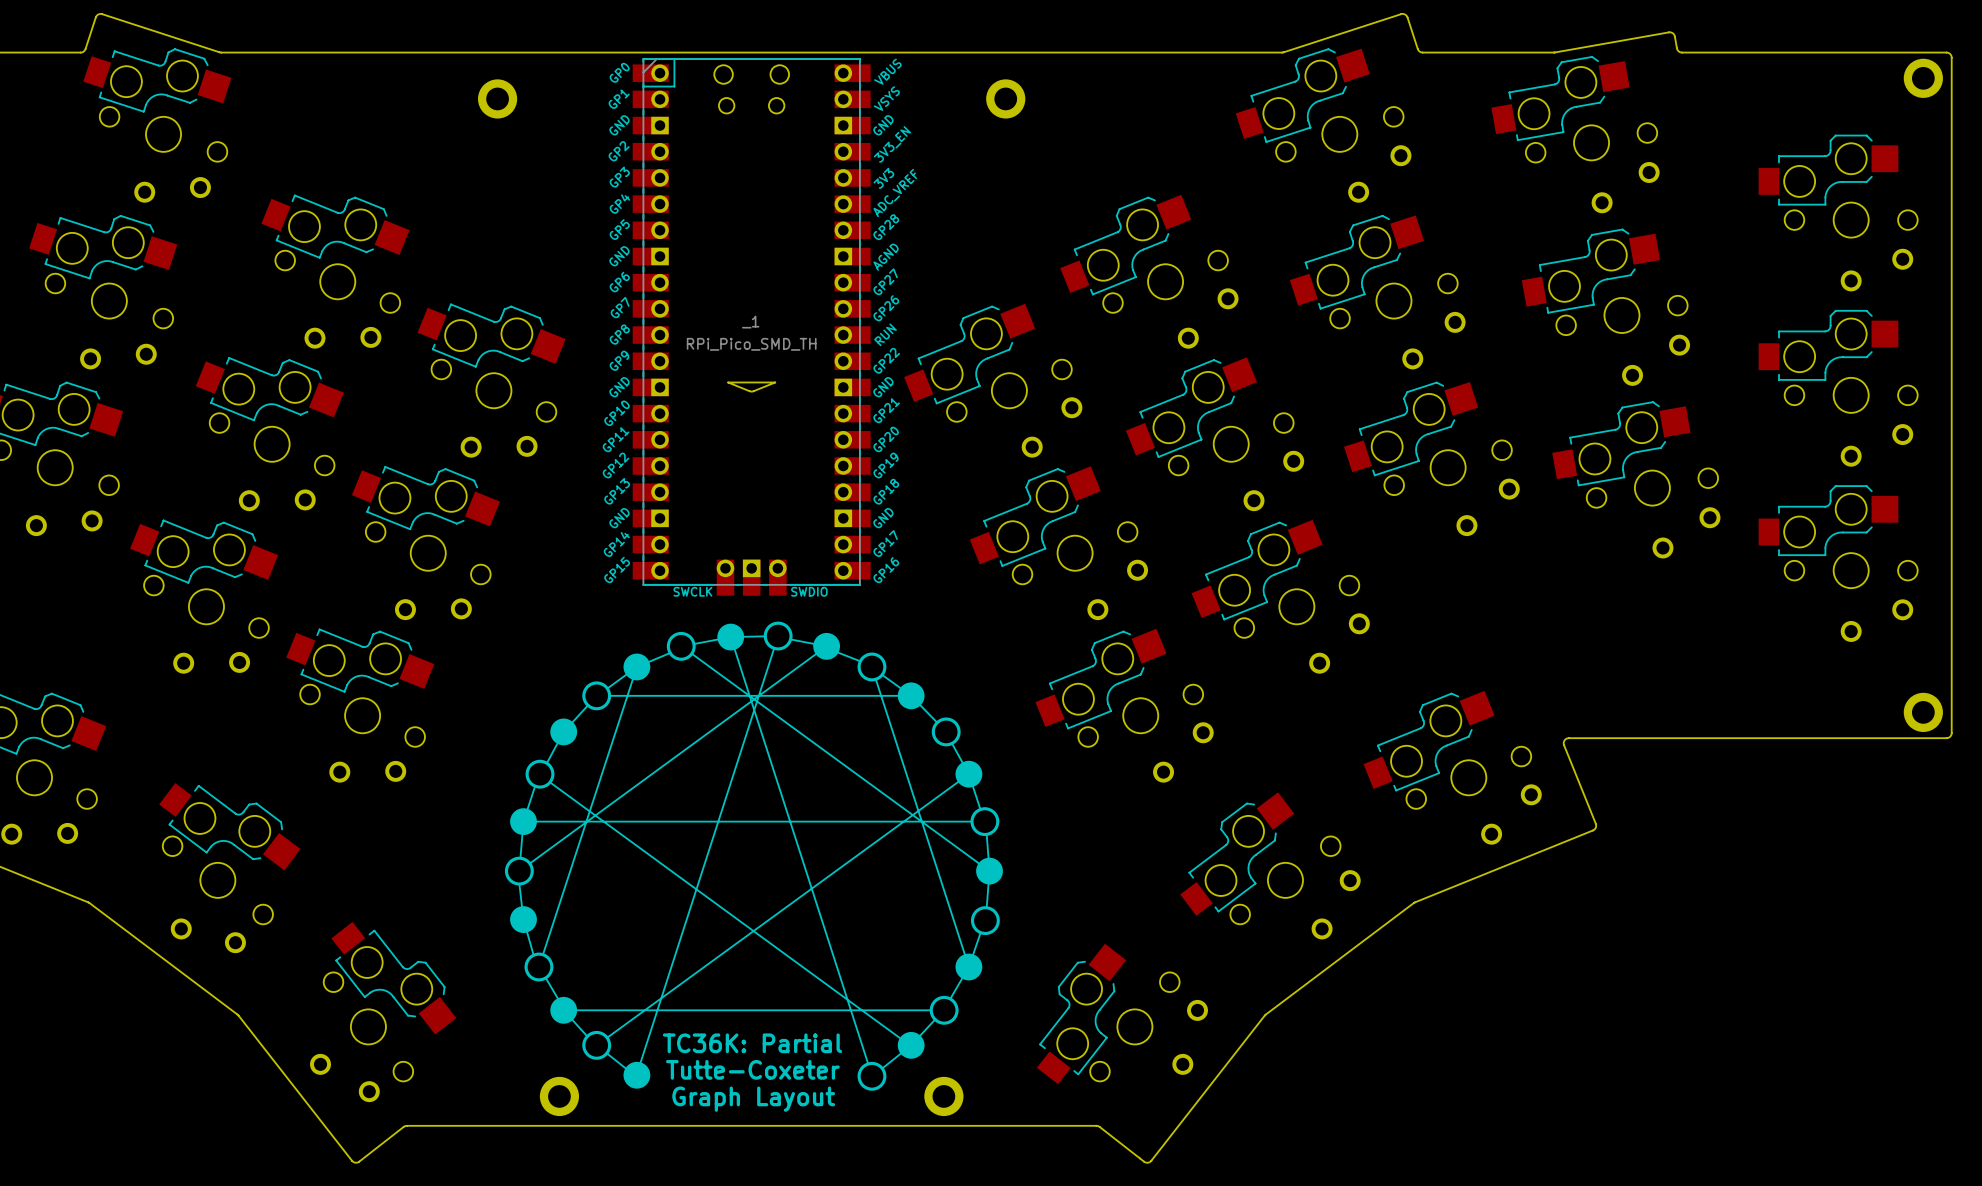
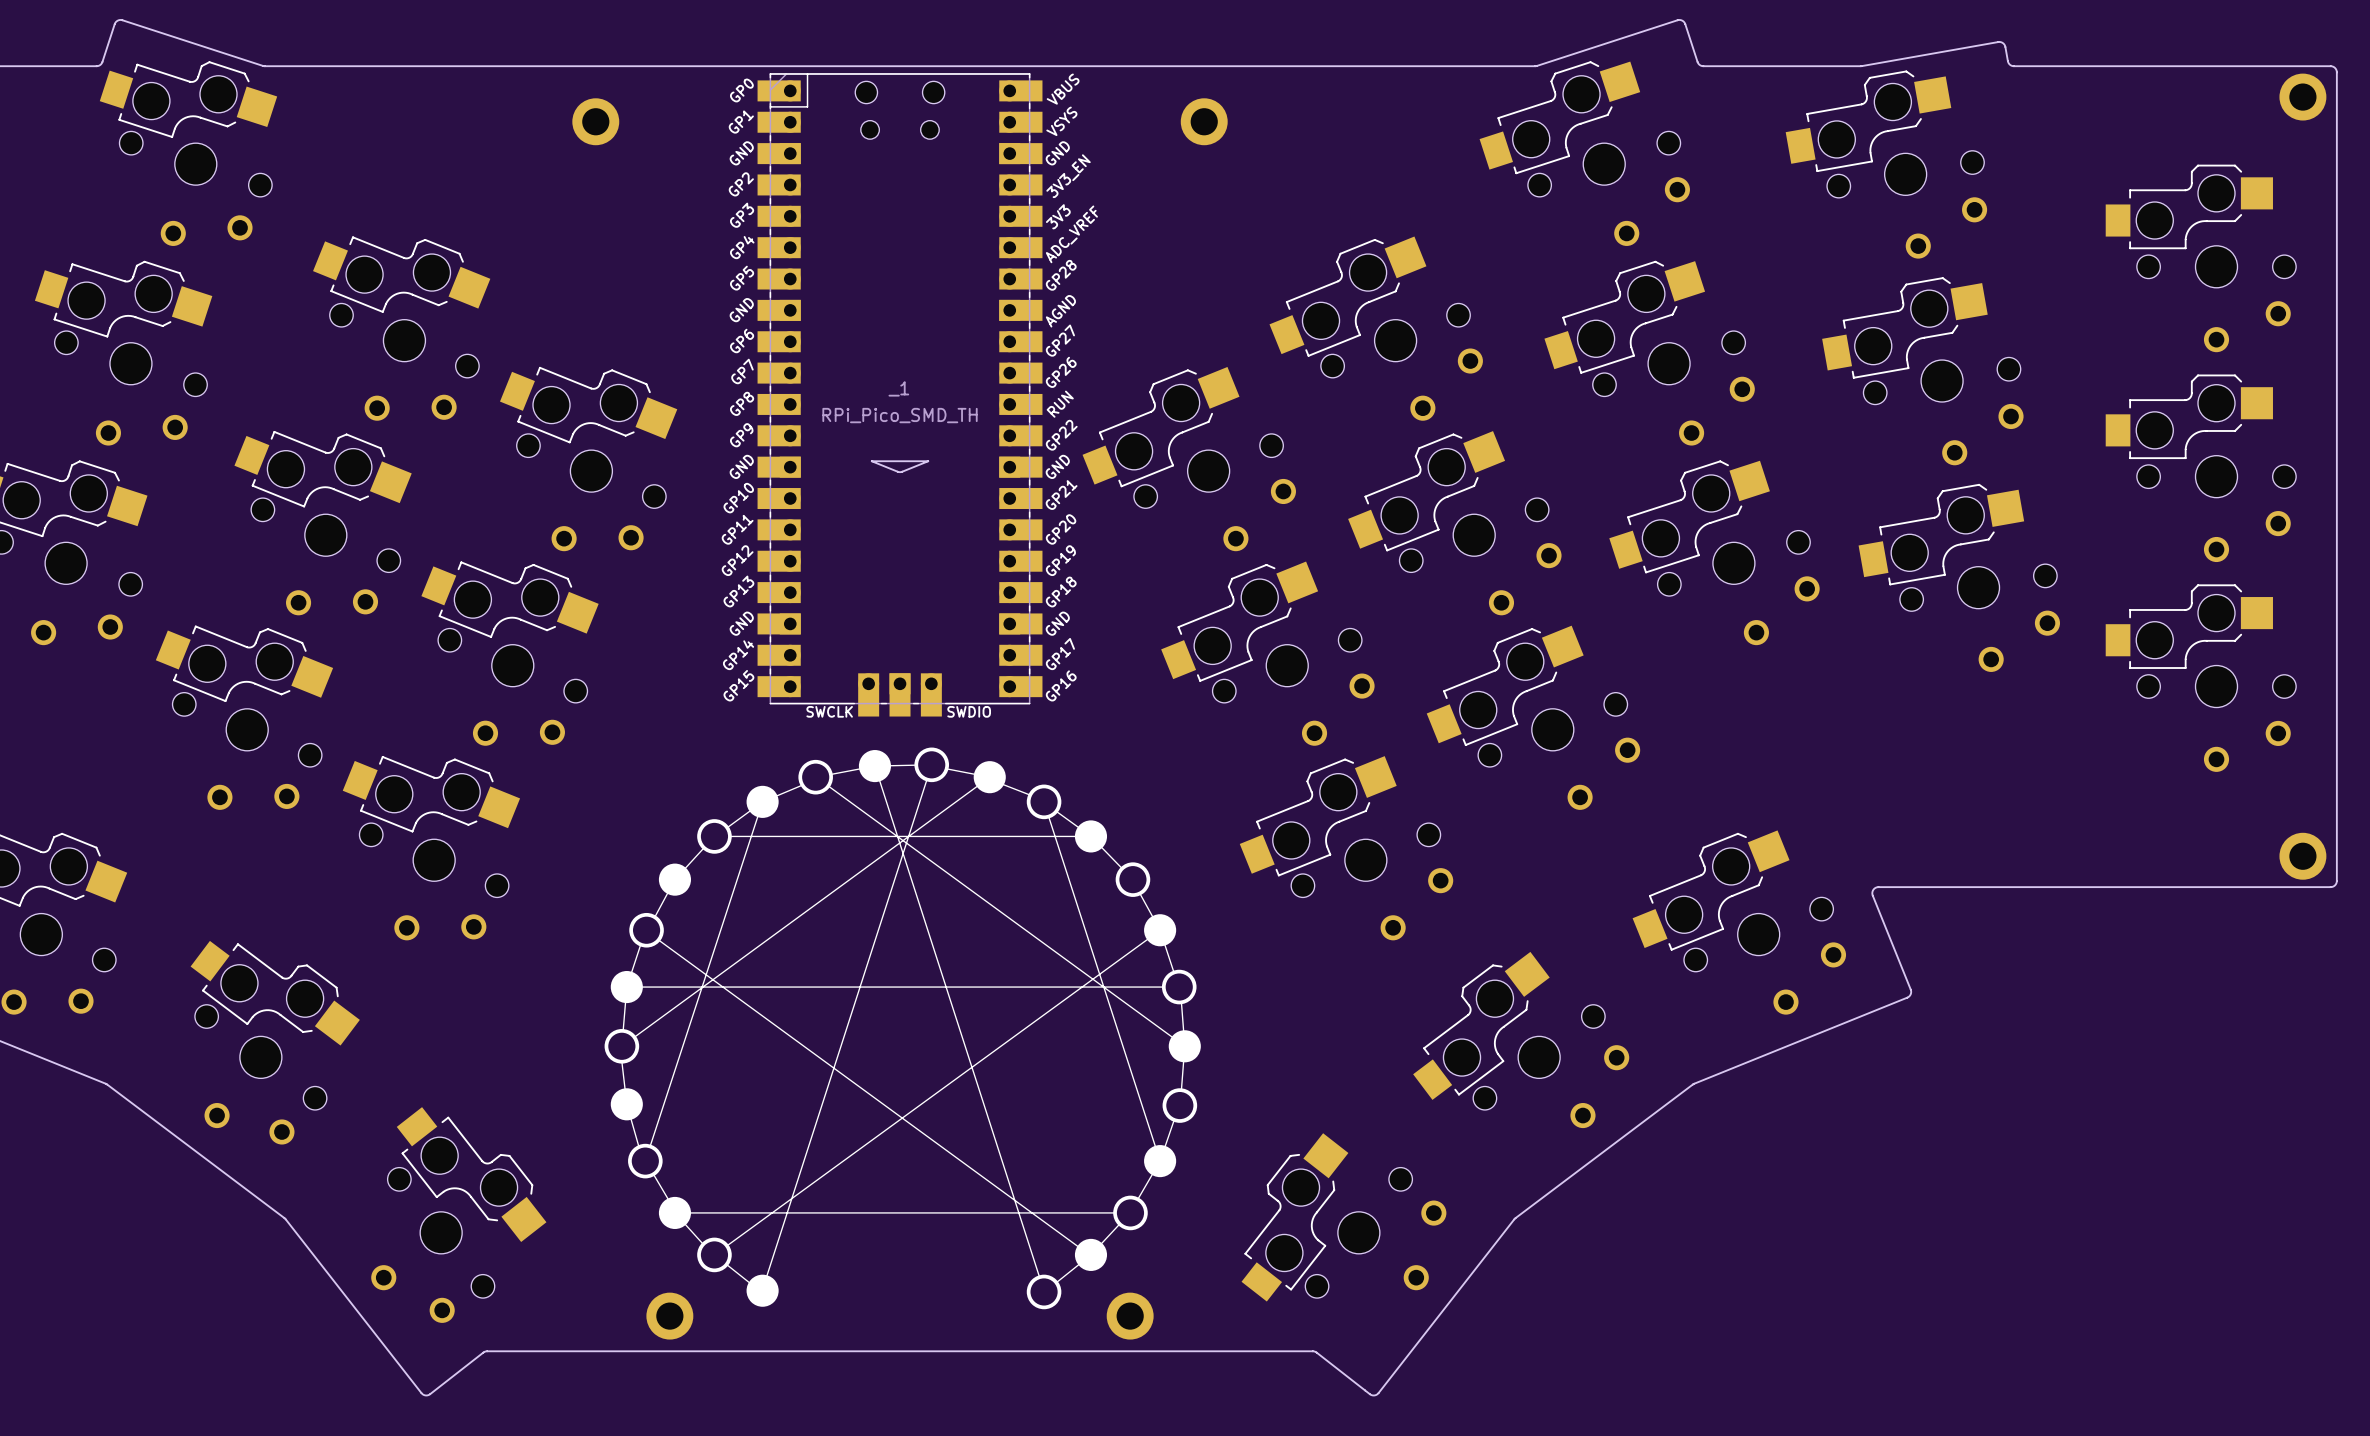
text: TC36K: Partial (752, 1043) -> none
text: Tutte-Coxeter (752, 1069) -> none
text: Graph Layout (753, 1099) -> none

